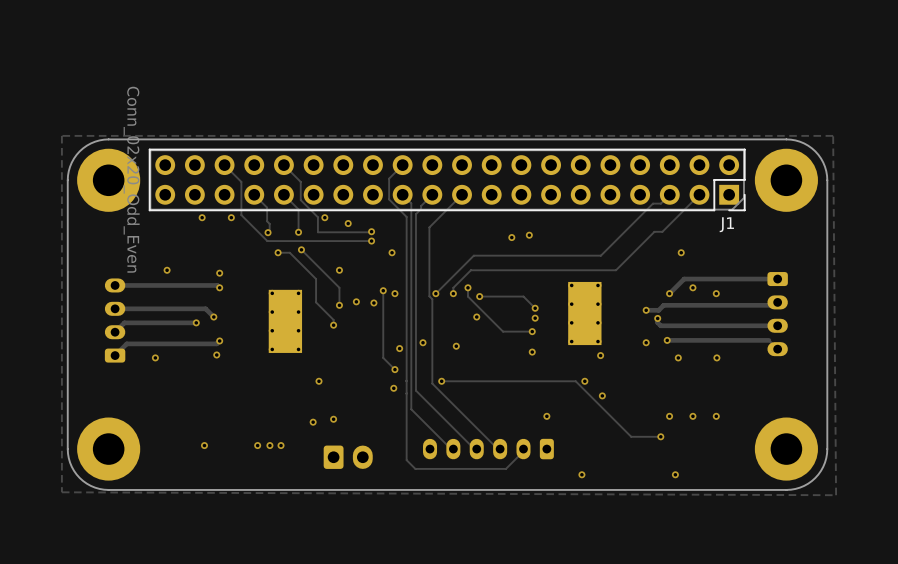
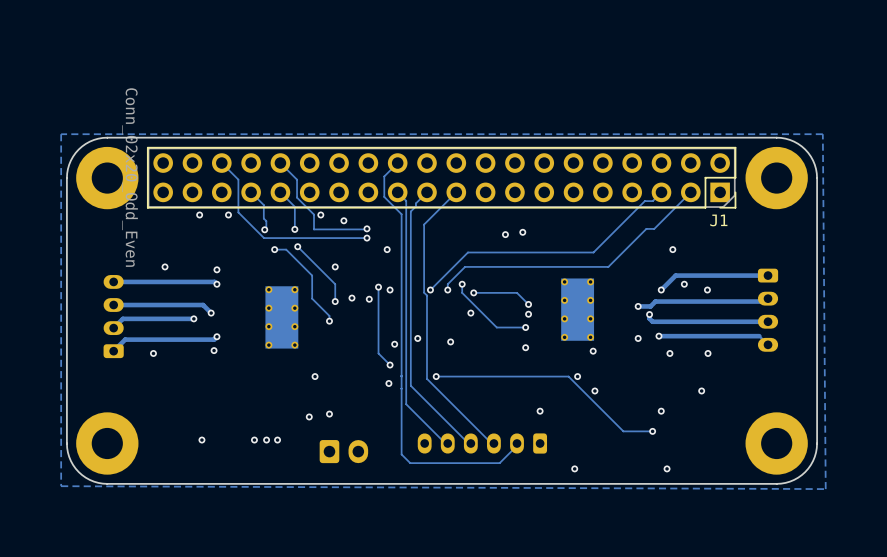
via: none -> (701, 390)
via: (692, 416) -> none
via: (716, 416) -> none

